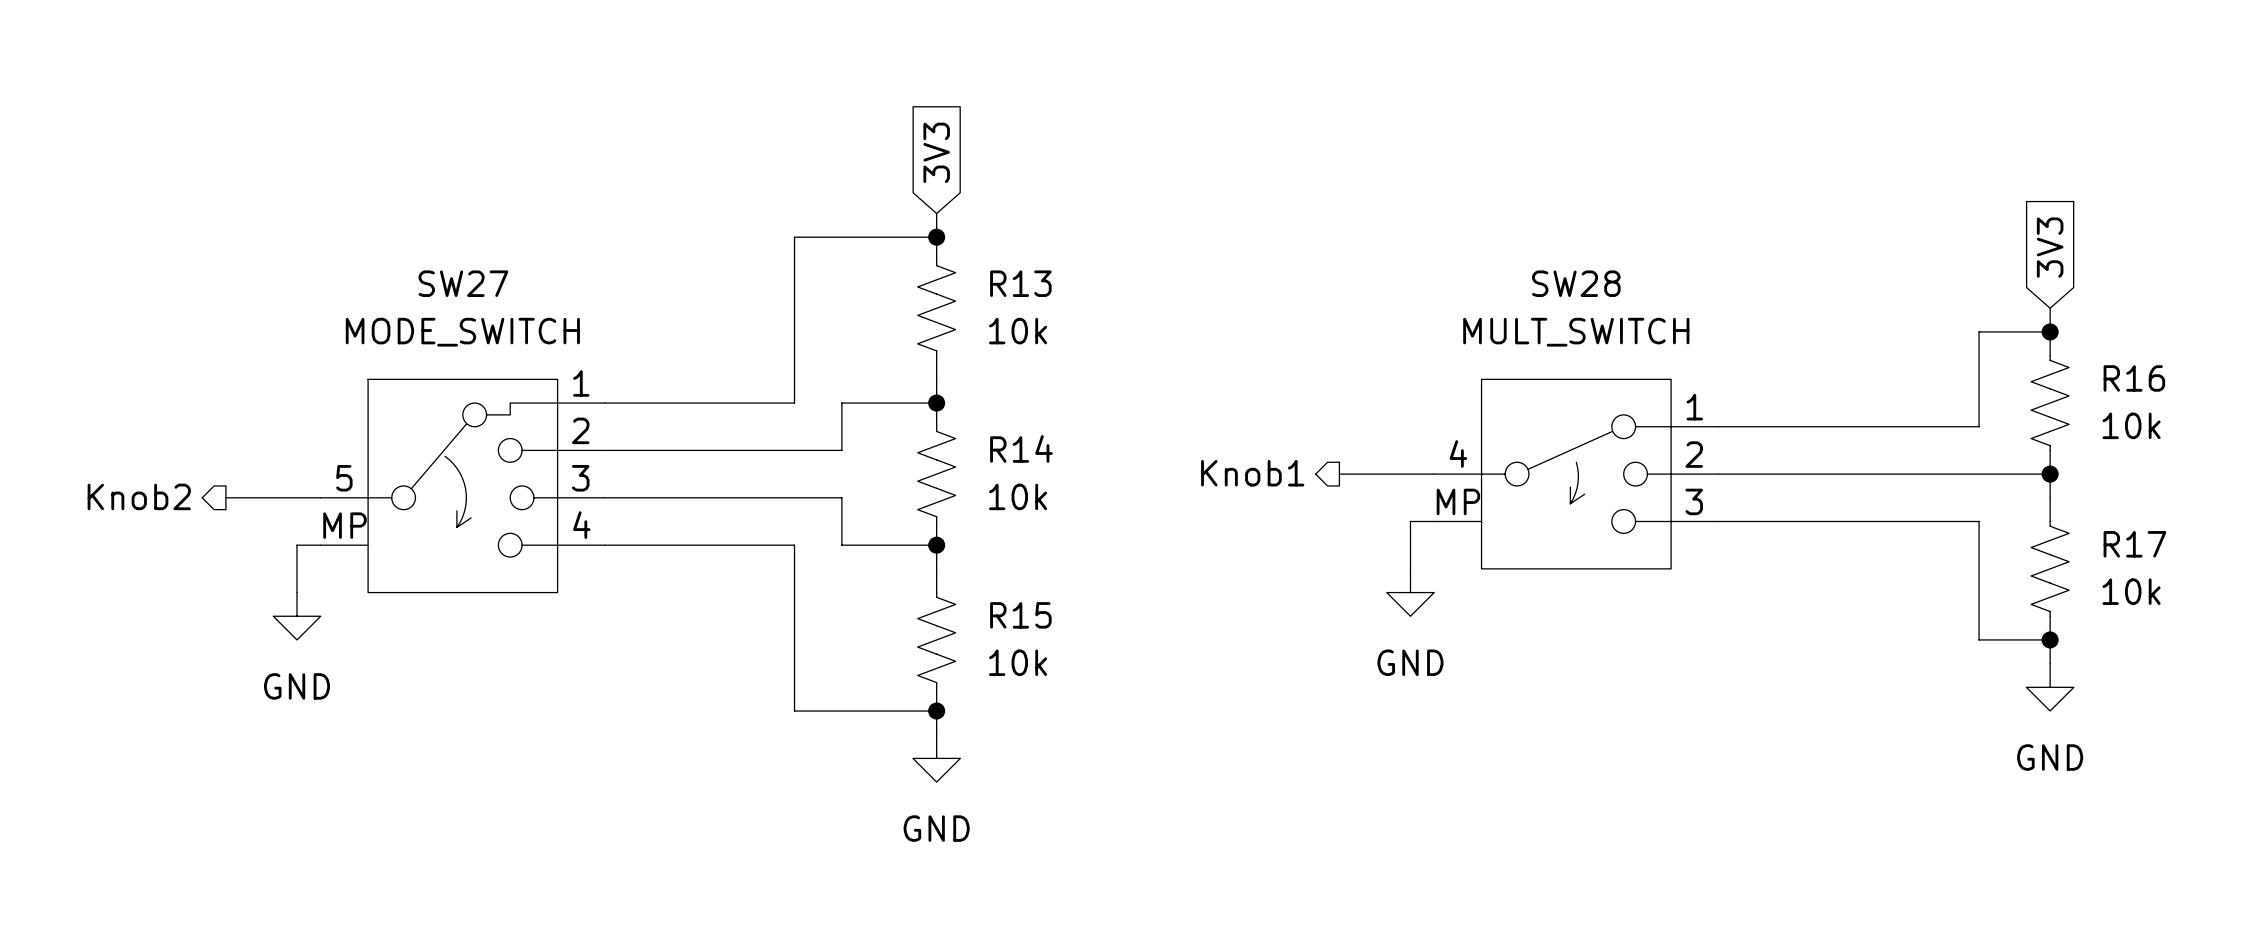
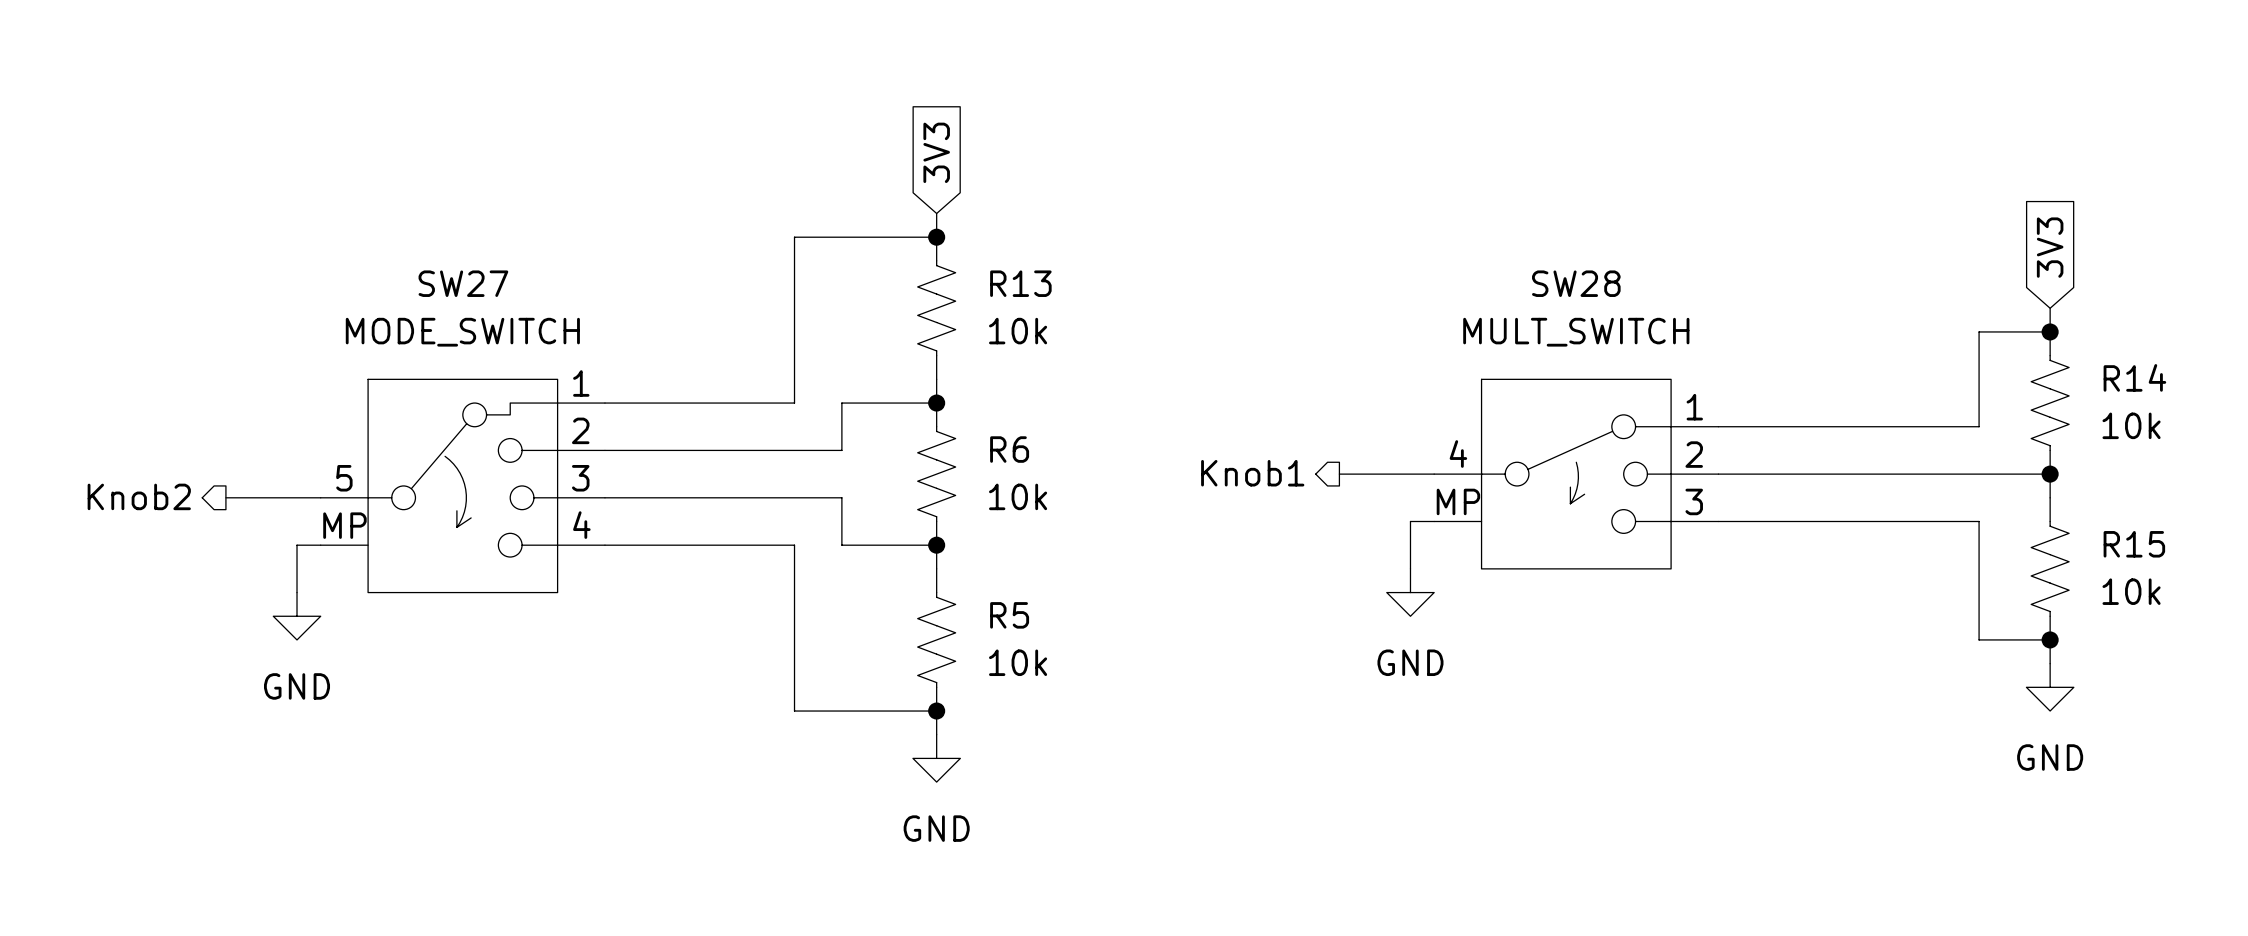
R16 name: R16 (2134, 378) -> R14 (2134, 377)
R14 name: R14 (1021, 448) -> R6 (1009, 449)
R17 name: R17 (2134, 544) -> R15 (2134, 544)
R15 name: R15 (1020, 615) -> R5 (1009, 615)

